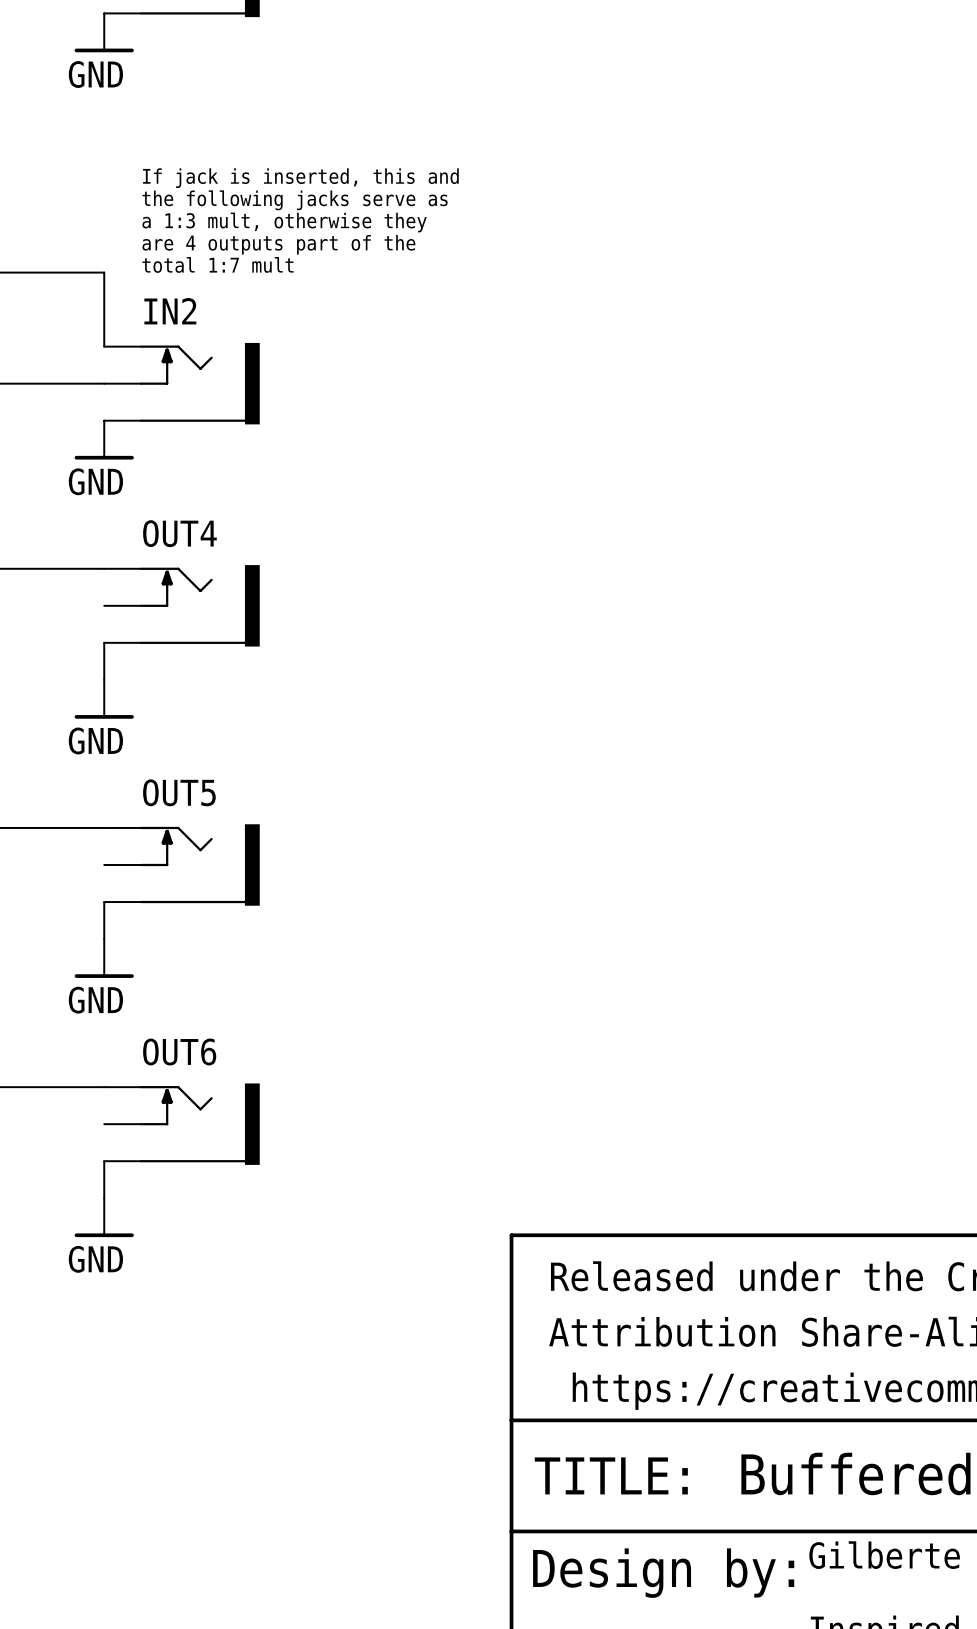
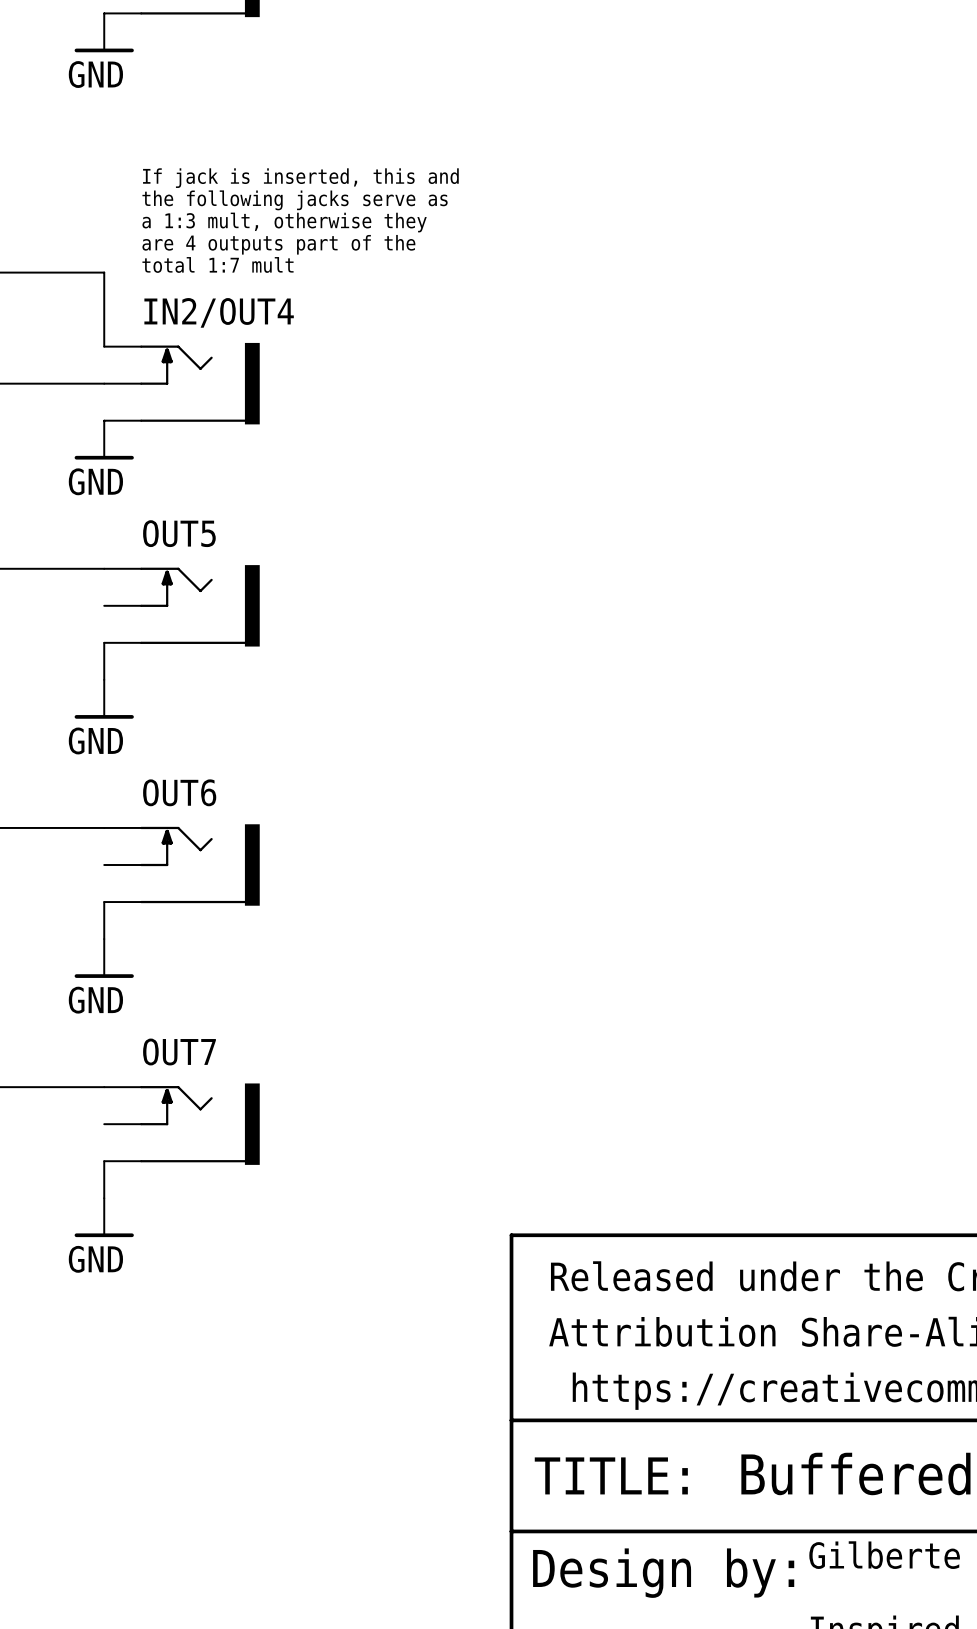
IN2 name: IN2 (170, 311) -> IN2/OUT4 (219, 312)
OUT4 name: OUT4 (179, 533) -> OUT5 (179, 533)
OUT5 name: OUT5 (179, 792) -> OUT6 (179, 792)
OUT6 name: OUT6 (179, 1051) -> OUT7 (179, 1051)

